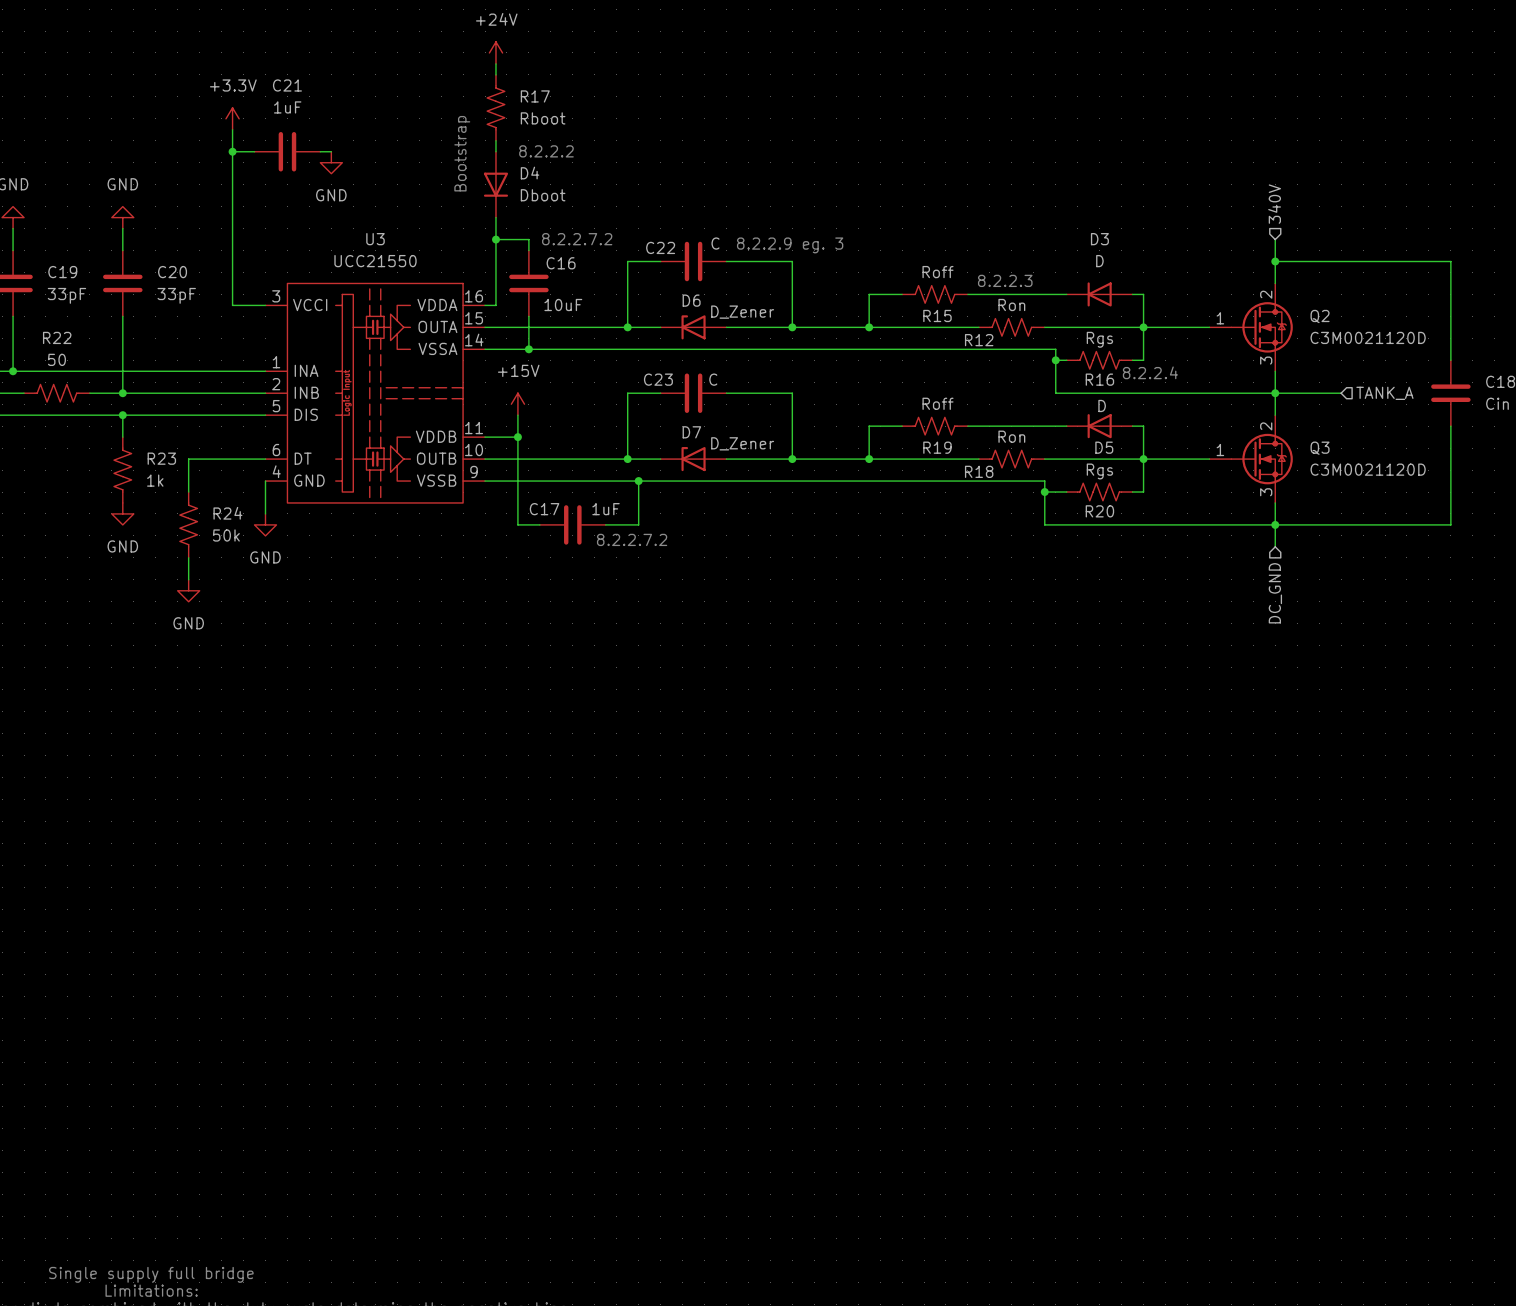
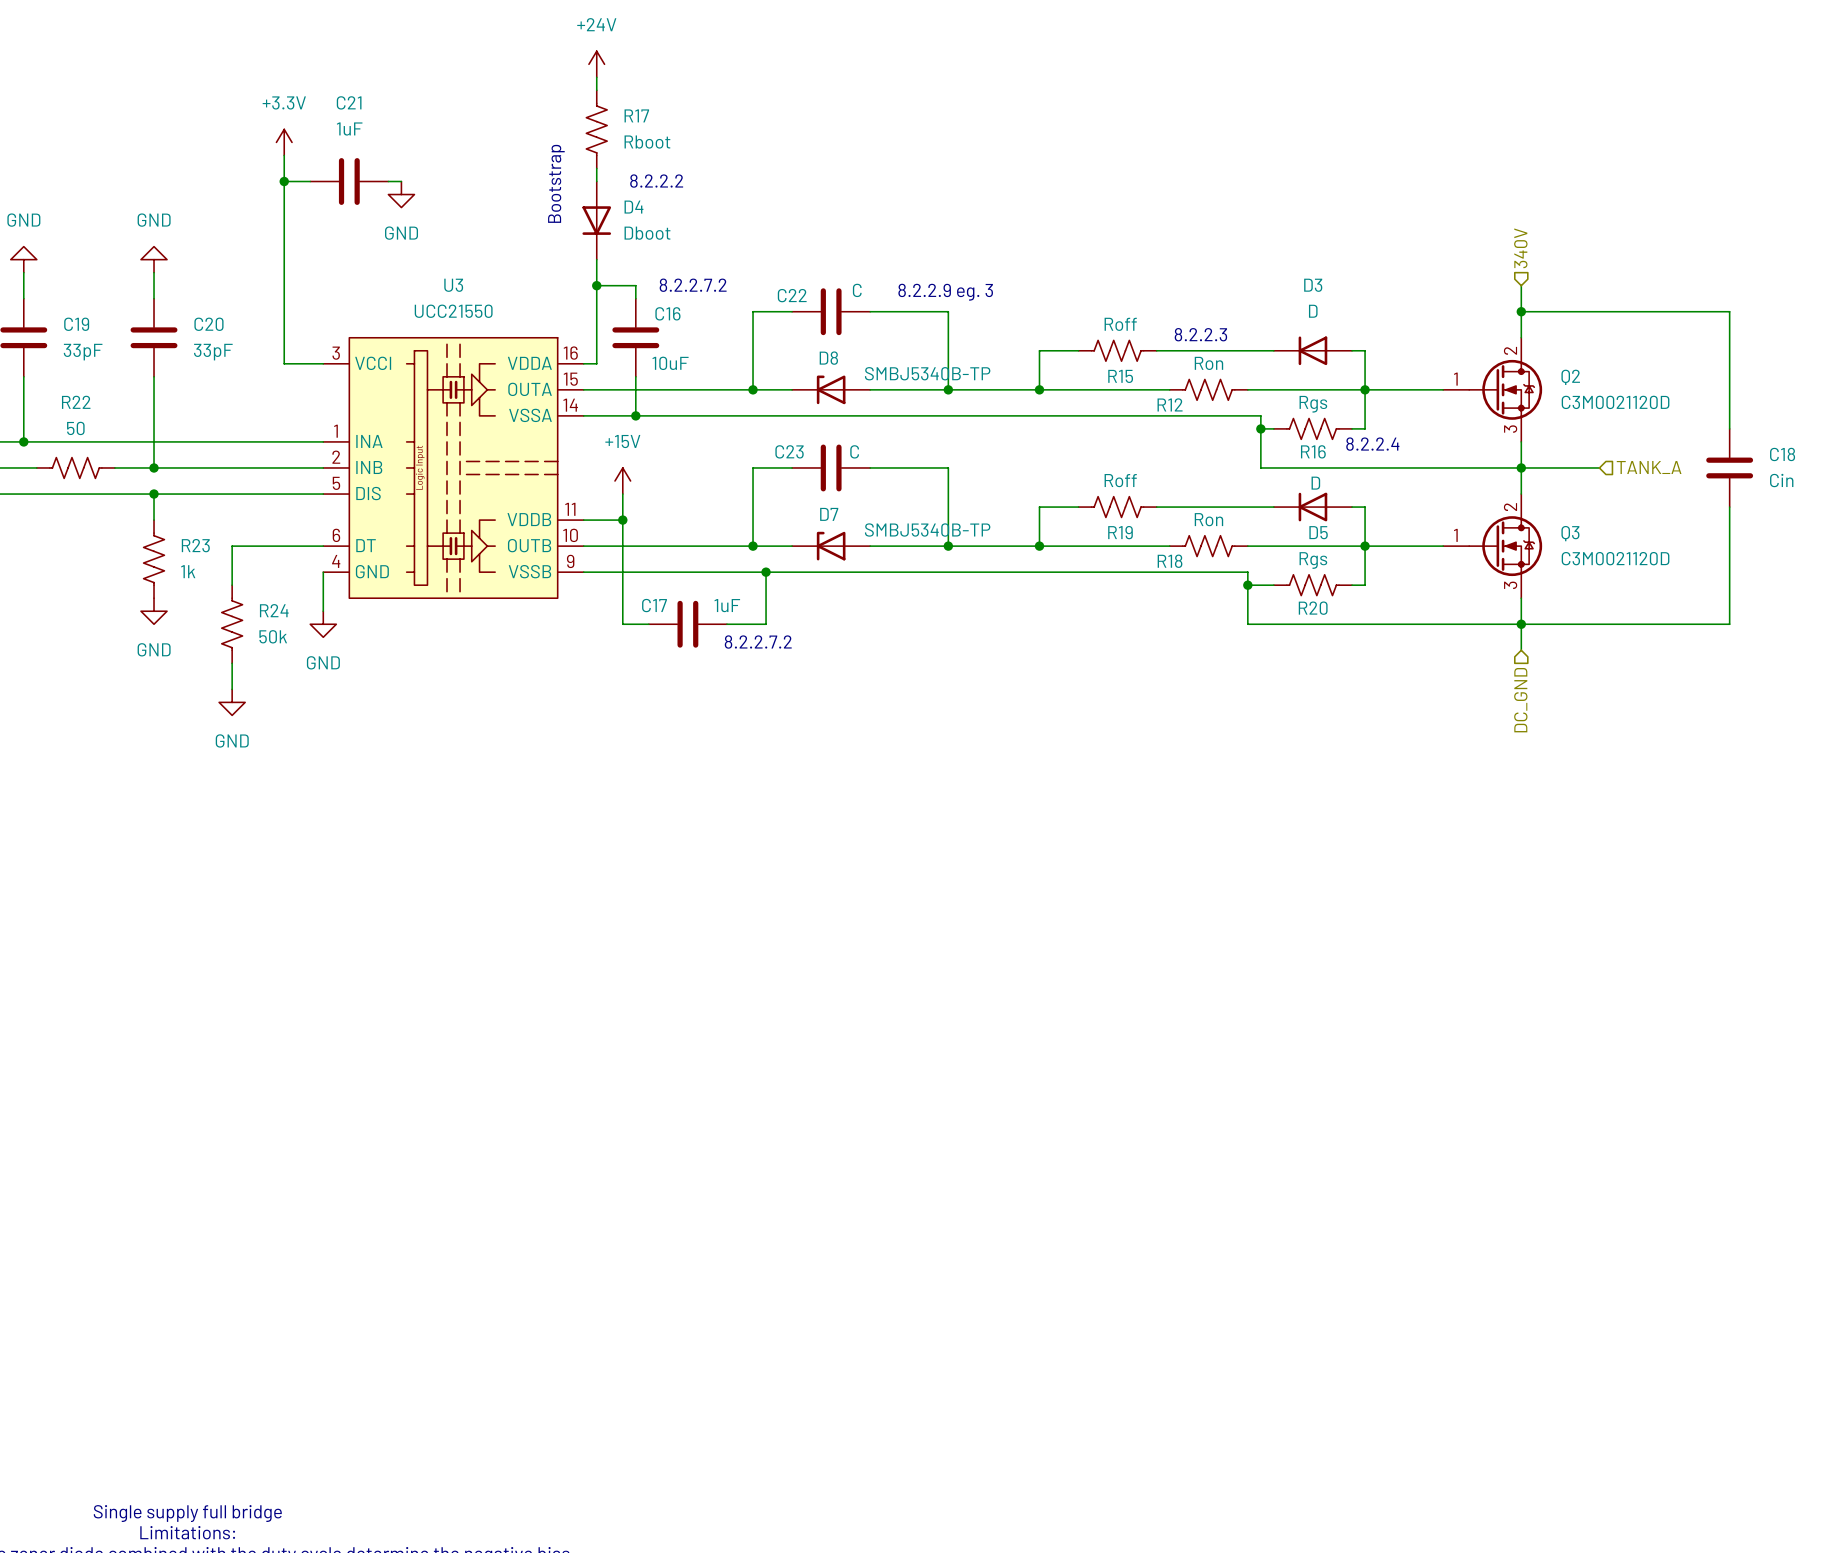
D6 name: D6 (691, 300) -> D8 (828, 358)
D6 value: D_Zener (742, 312) -> SMBJ5340B-TP (927, 373)
D7 value: D_Zener (742, 443) -> SMBJ5340B-TP (927, 530)

